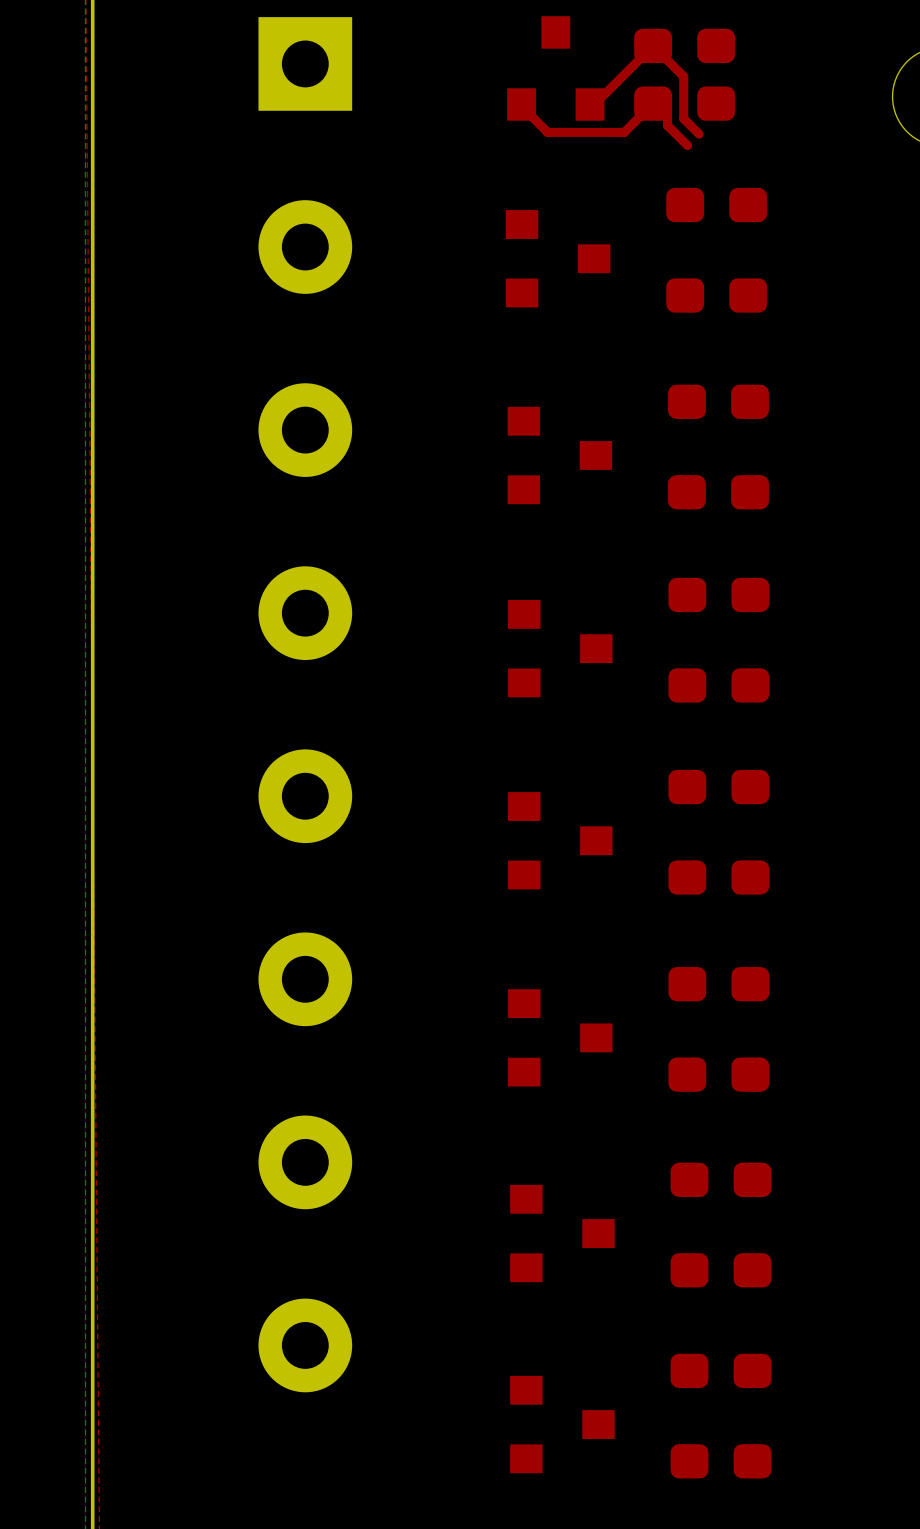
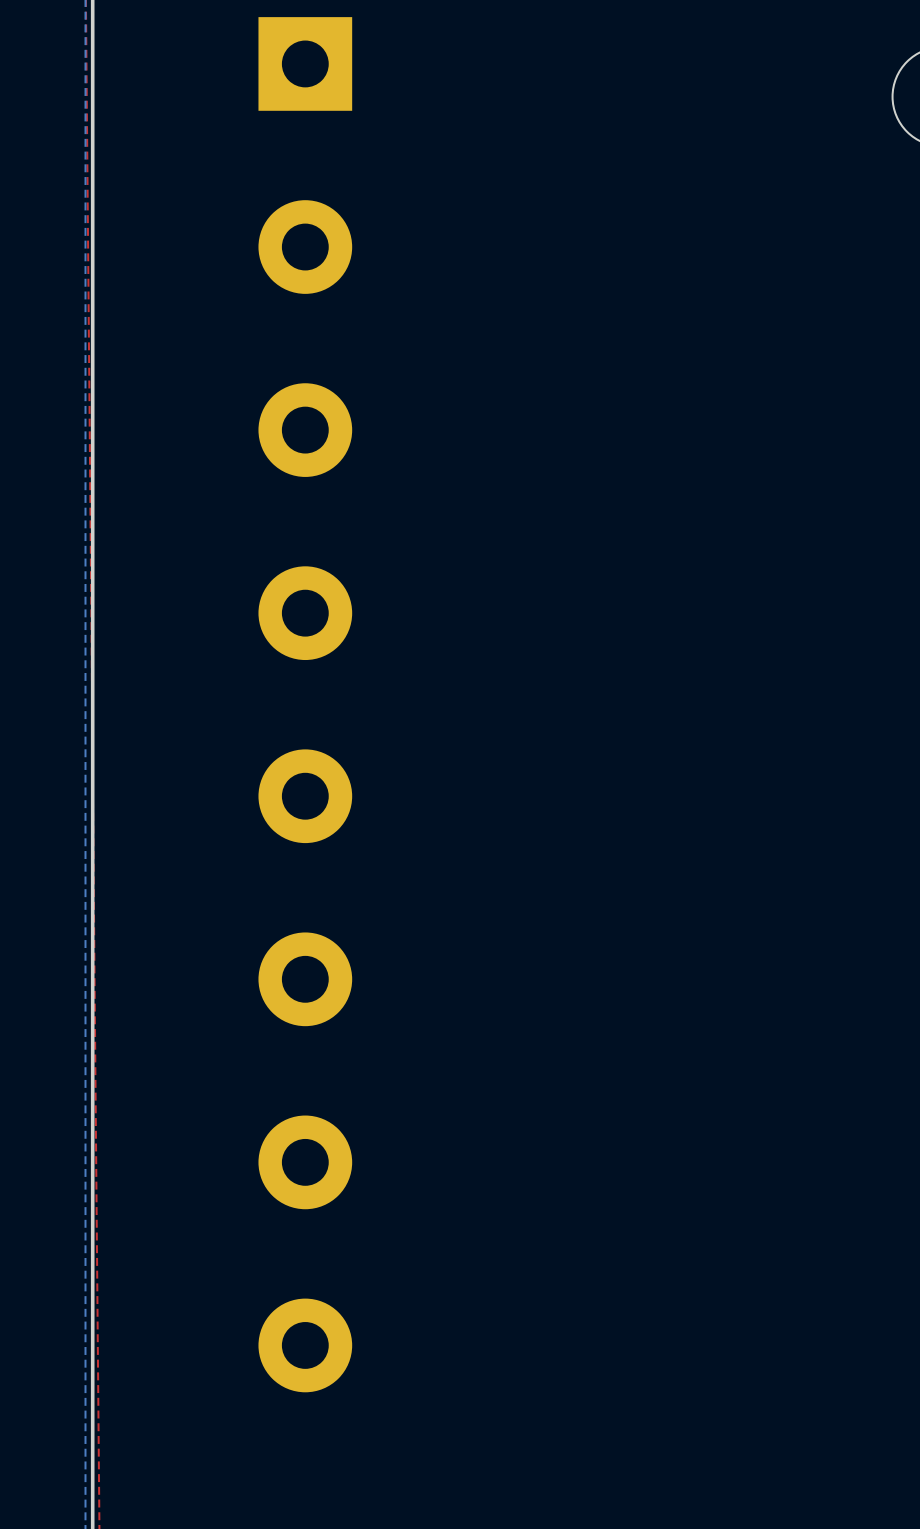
part: (684, 45) -> none
part: (555, 68) -> none
part: (684, 103) -> none
top track: (521, 104) (547, 132) (624, 132) (653, 103) (661, 103) (667, 109) (667, 125) (687, 145) -> none
top track: (590, 104) (594, 104) (653, 45) (683, 76) (683, 118) (699, 134) -> none
part: (716, 205) -> none
part: (558, 258) -> none
part: (716, 295) -> none
part: (718, 401) -> none
part: (559, 455) -> none
part: (718, 492) -> none
part: (718, 594) -> none
part: (560, 648) -> none
part: (718, 685) -> none
part: (718, 787) -> none
part: (560, 840) -> none
part: (718, 877) -> none
part: (718, 984) -> none
part: (560, 1037) -> none
part: (718, 1074) -> none
part: (721, 1179) -> none
part: (562, 1233) -> none
part: (721, 1270) -> none
part: (721, 1370) -> none
part: (562, 1424) -> none
part: (721, 1461) -> none

